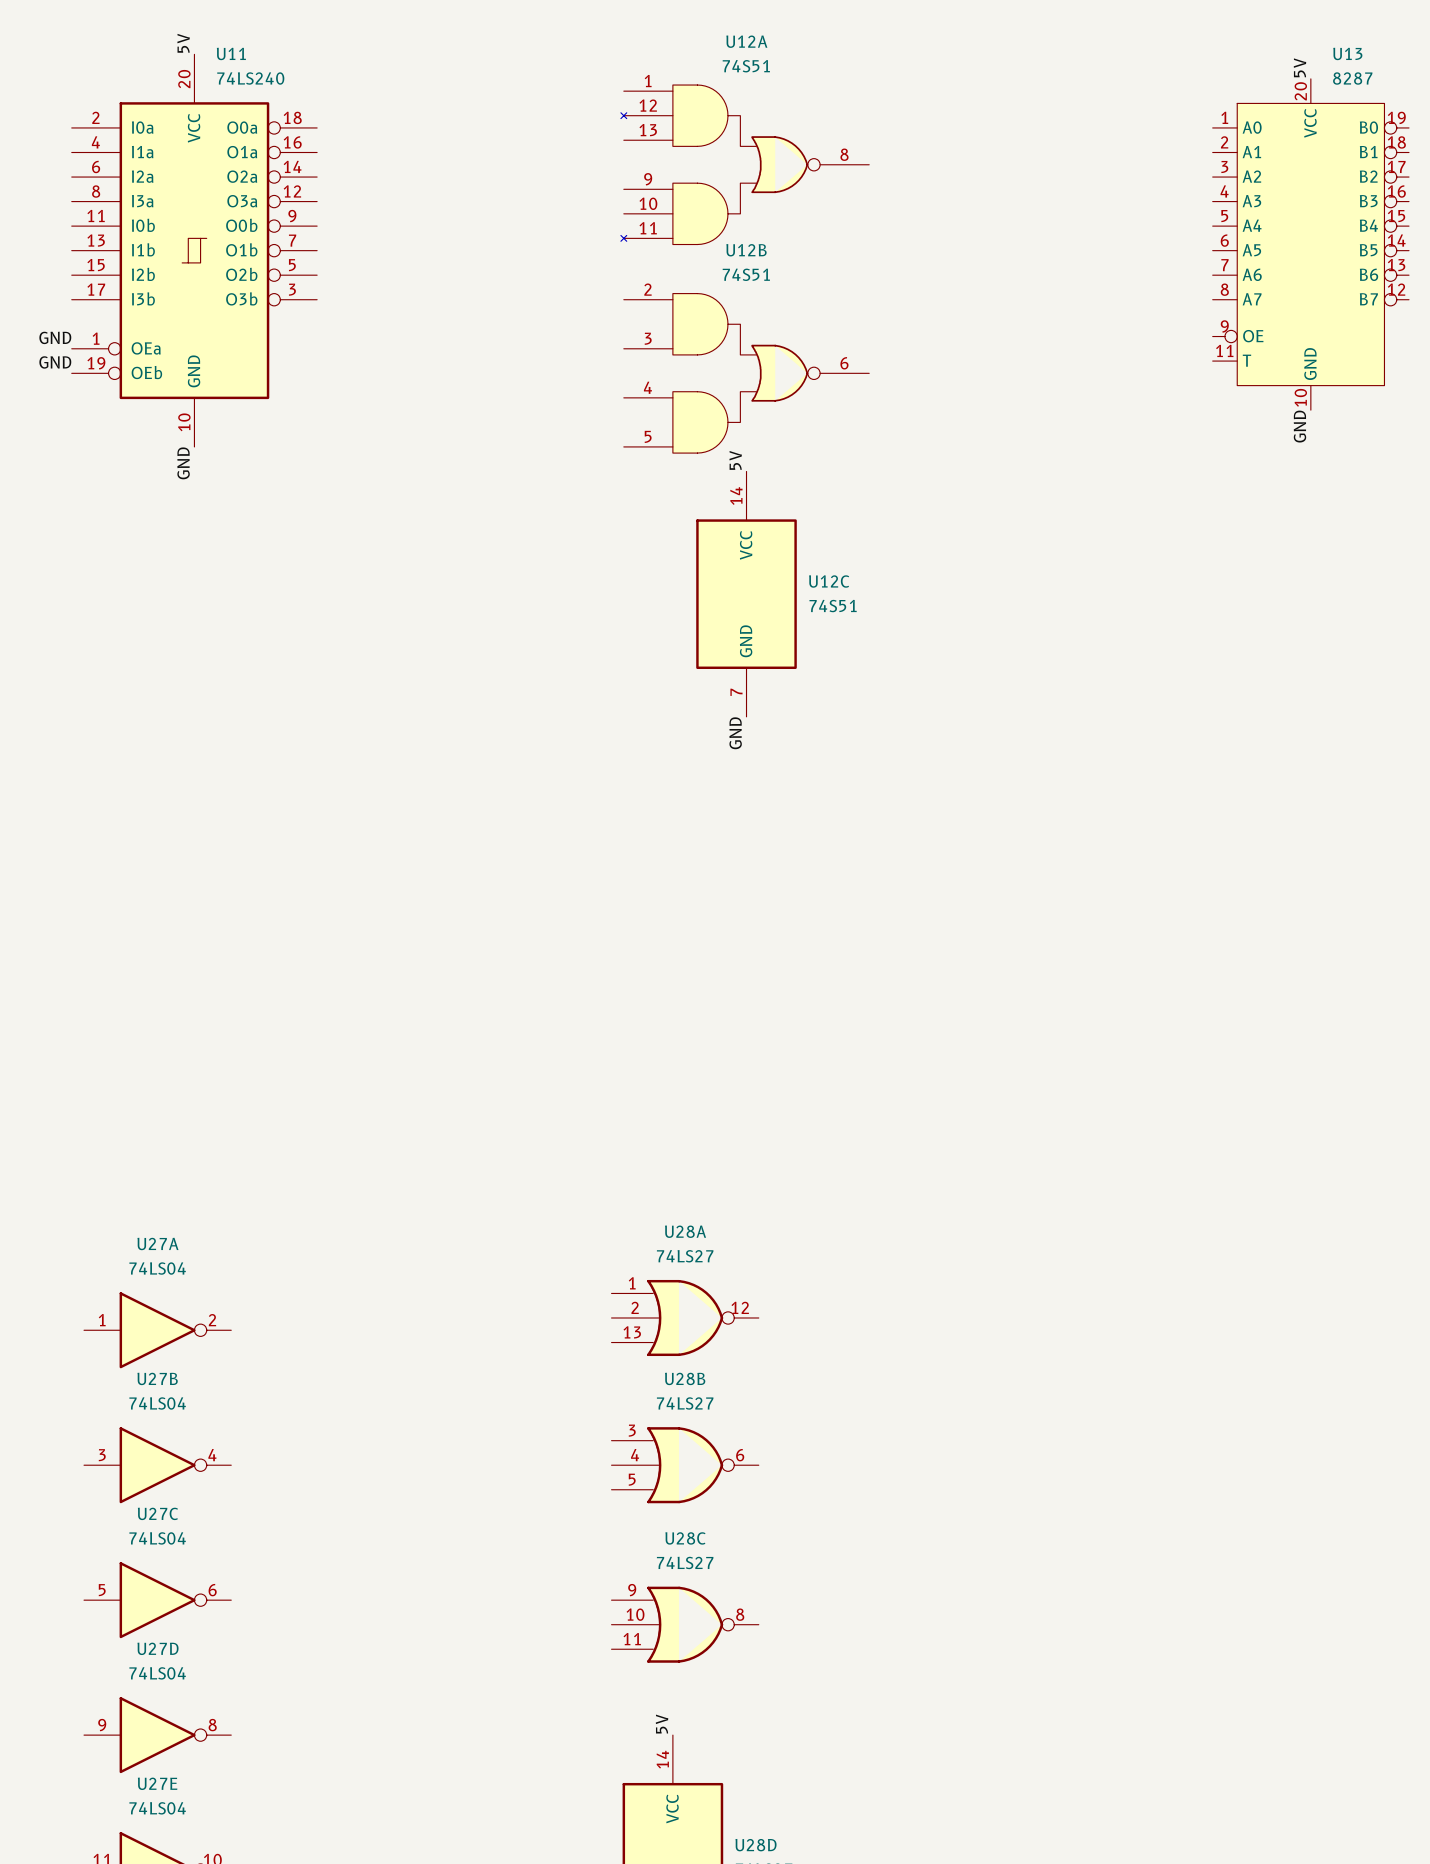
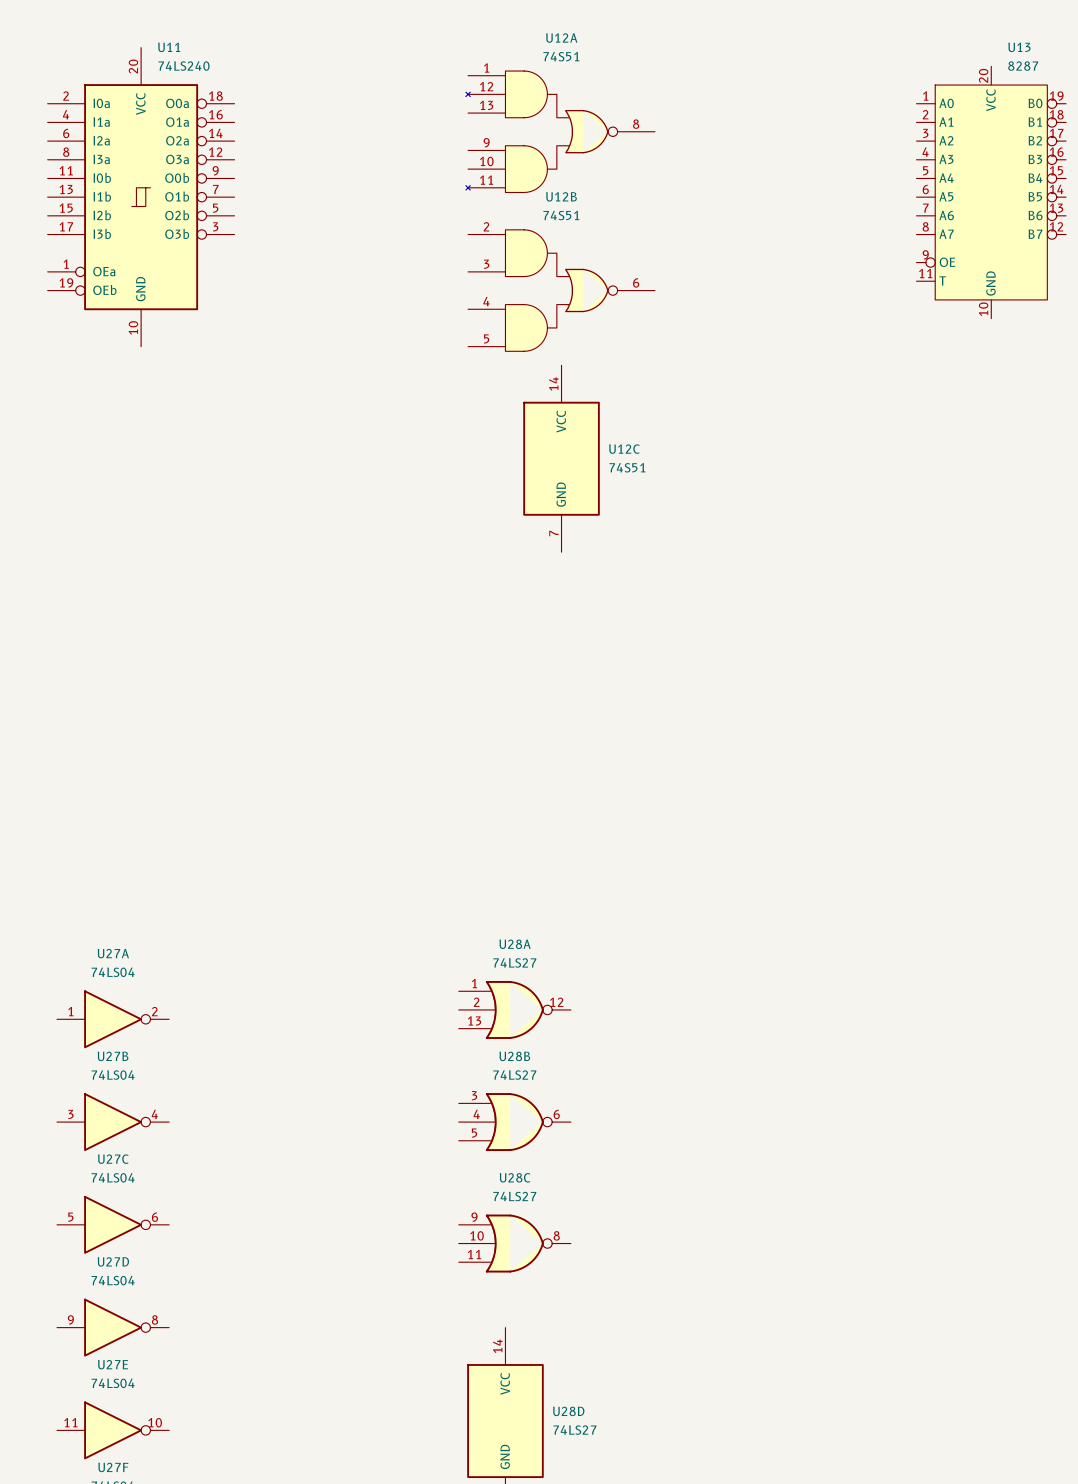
label: 5V (183, 43) -> none
label: 5V (1299, 67) -> none
label: GND (55, 337) -> none
label: GND (55, 362) -> none
label: GND (1299, 426) -> none
label: 5V (735, 460) -> none
label: GND (183, 463) -> none
label: GND (735, 733) -> none
label: 5V (662, 1724) -> none

